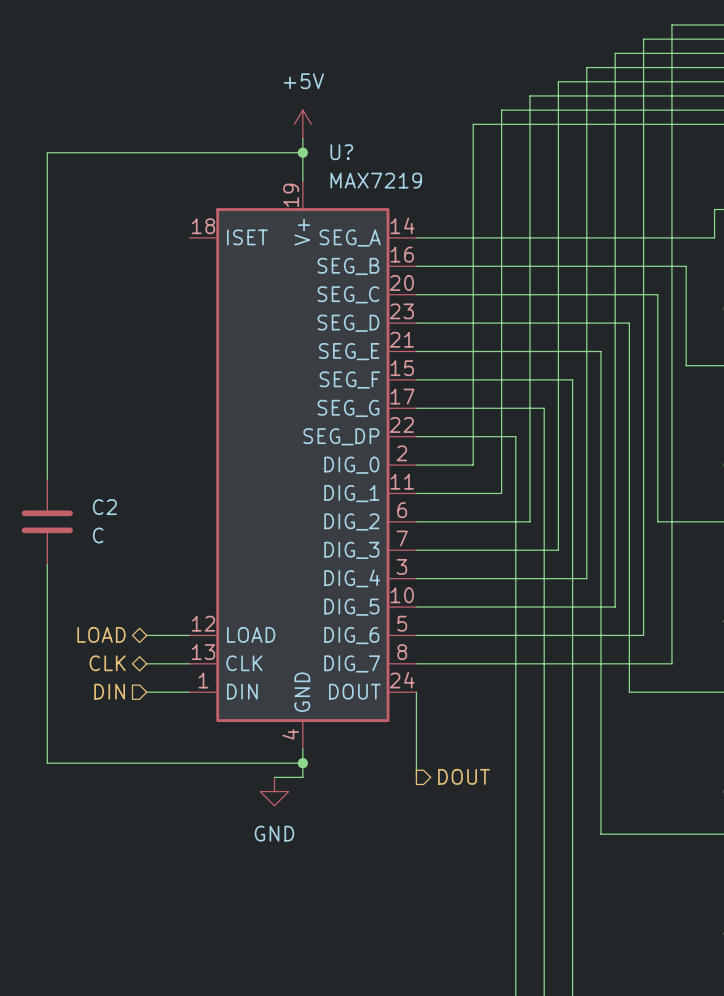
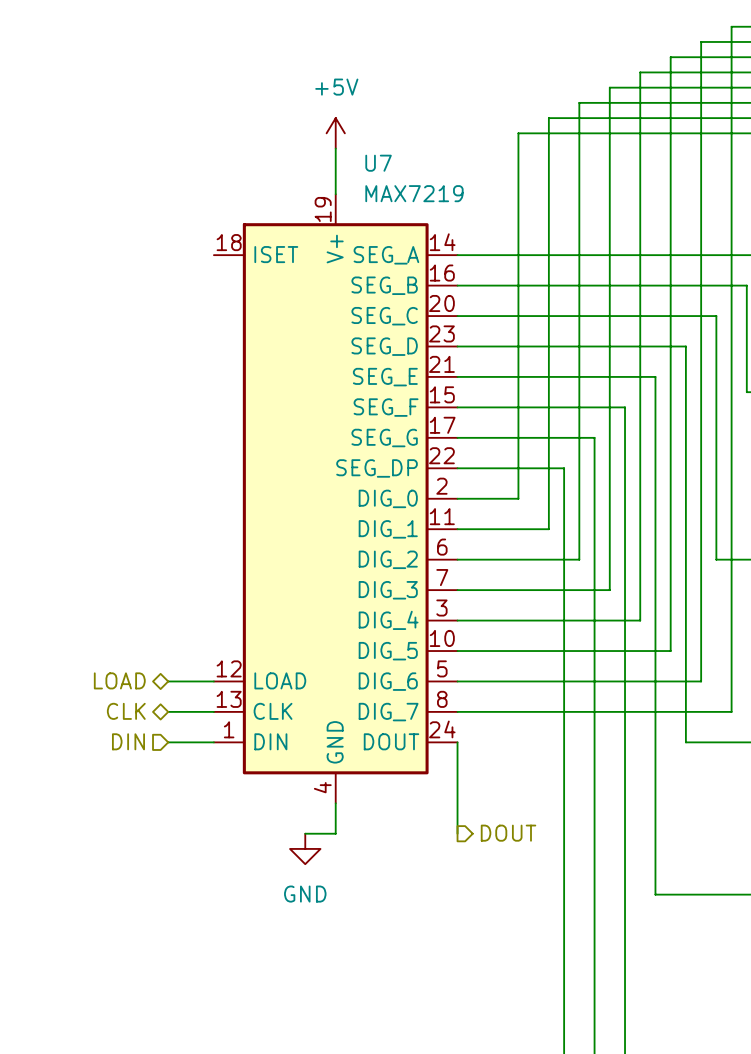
wire: (302, 152) (47, 152) (47, 479) -> none
junction: (302, 152) -> none
U? name: U? (341, 152) -> U7 (378, 163)
C2: C (47, 521) -> none
wire: (47, 564) (47, 763) (302, 763) -> none
junction: (302, 763) -> none

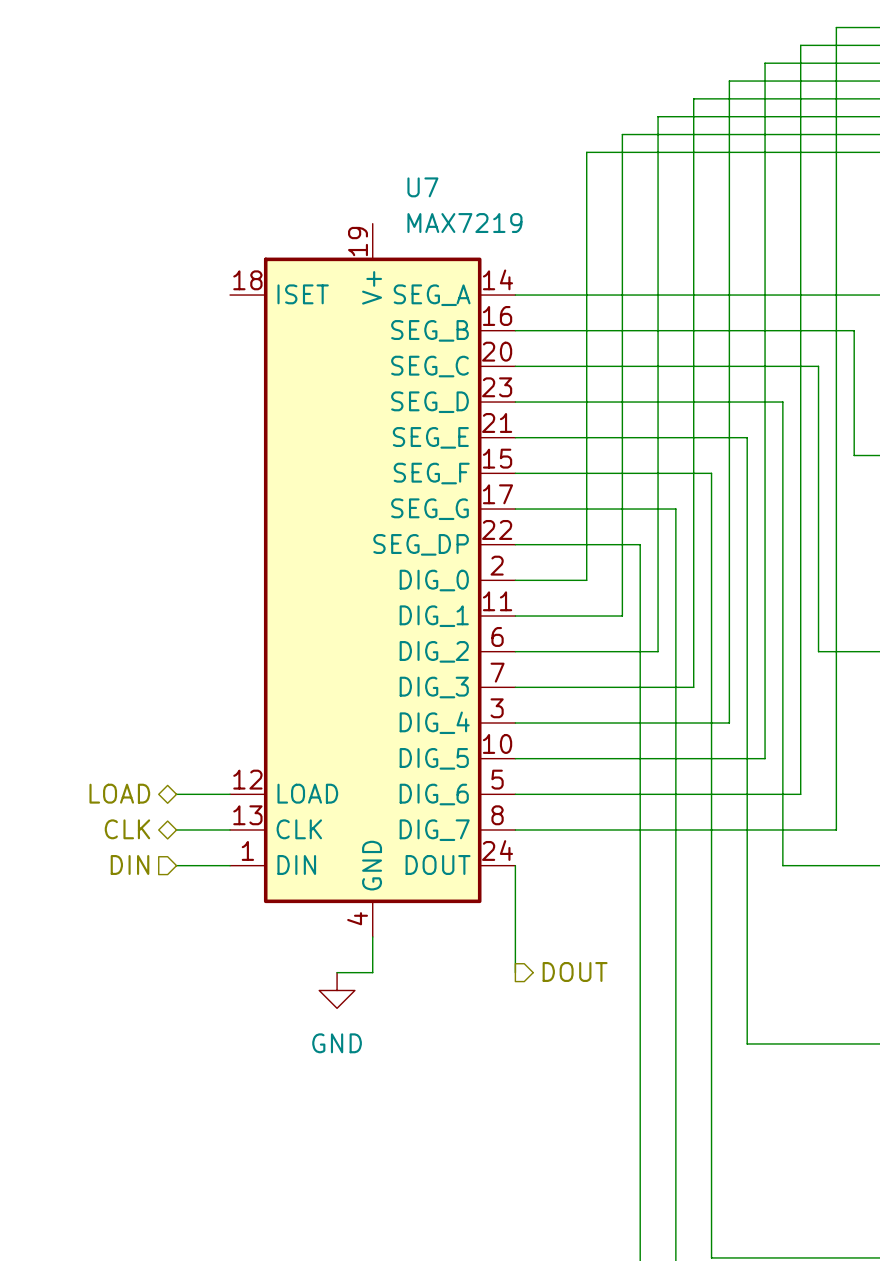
power symbol: +5V (335, 133) -> none
wire: (335, 148) (335, 194) -> none

